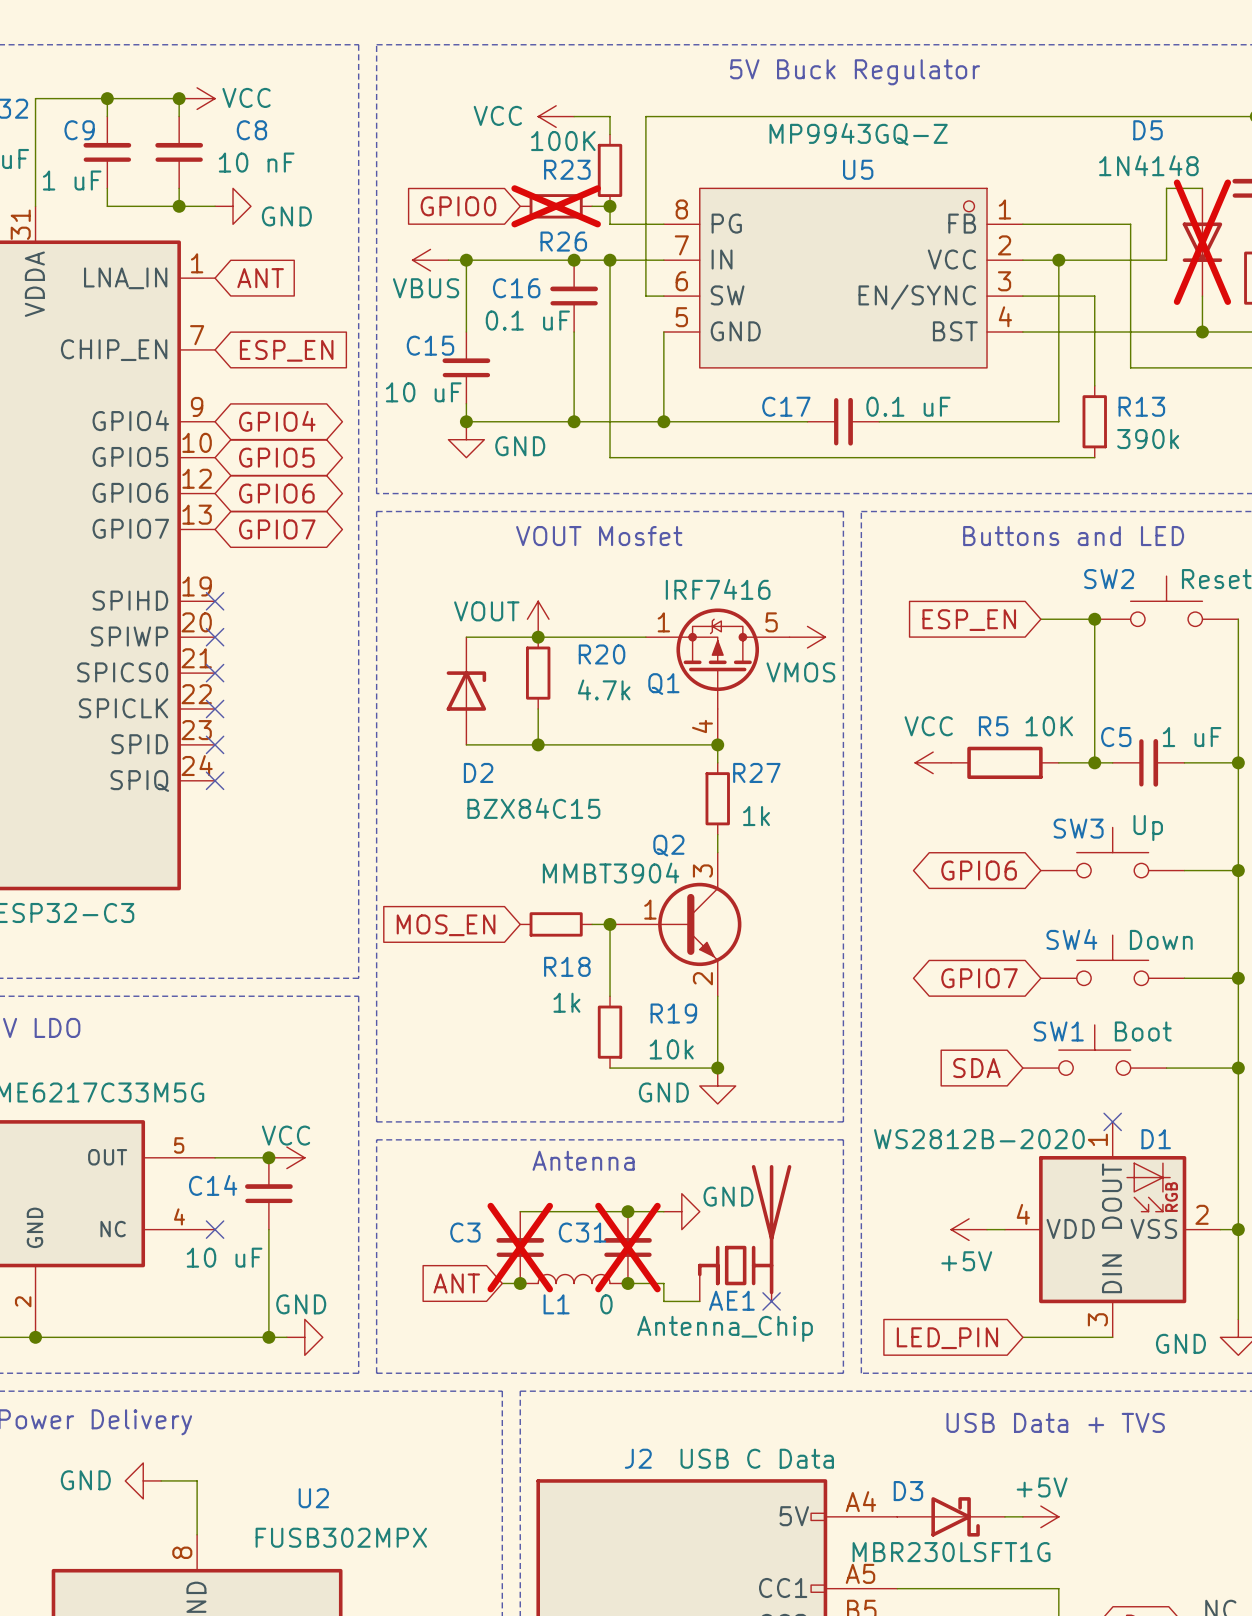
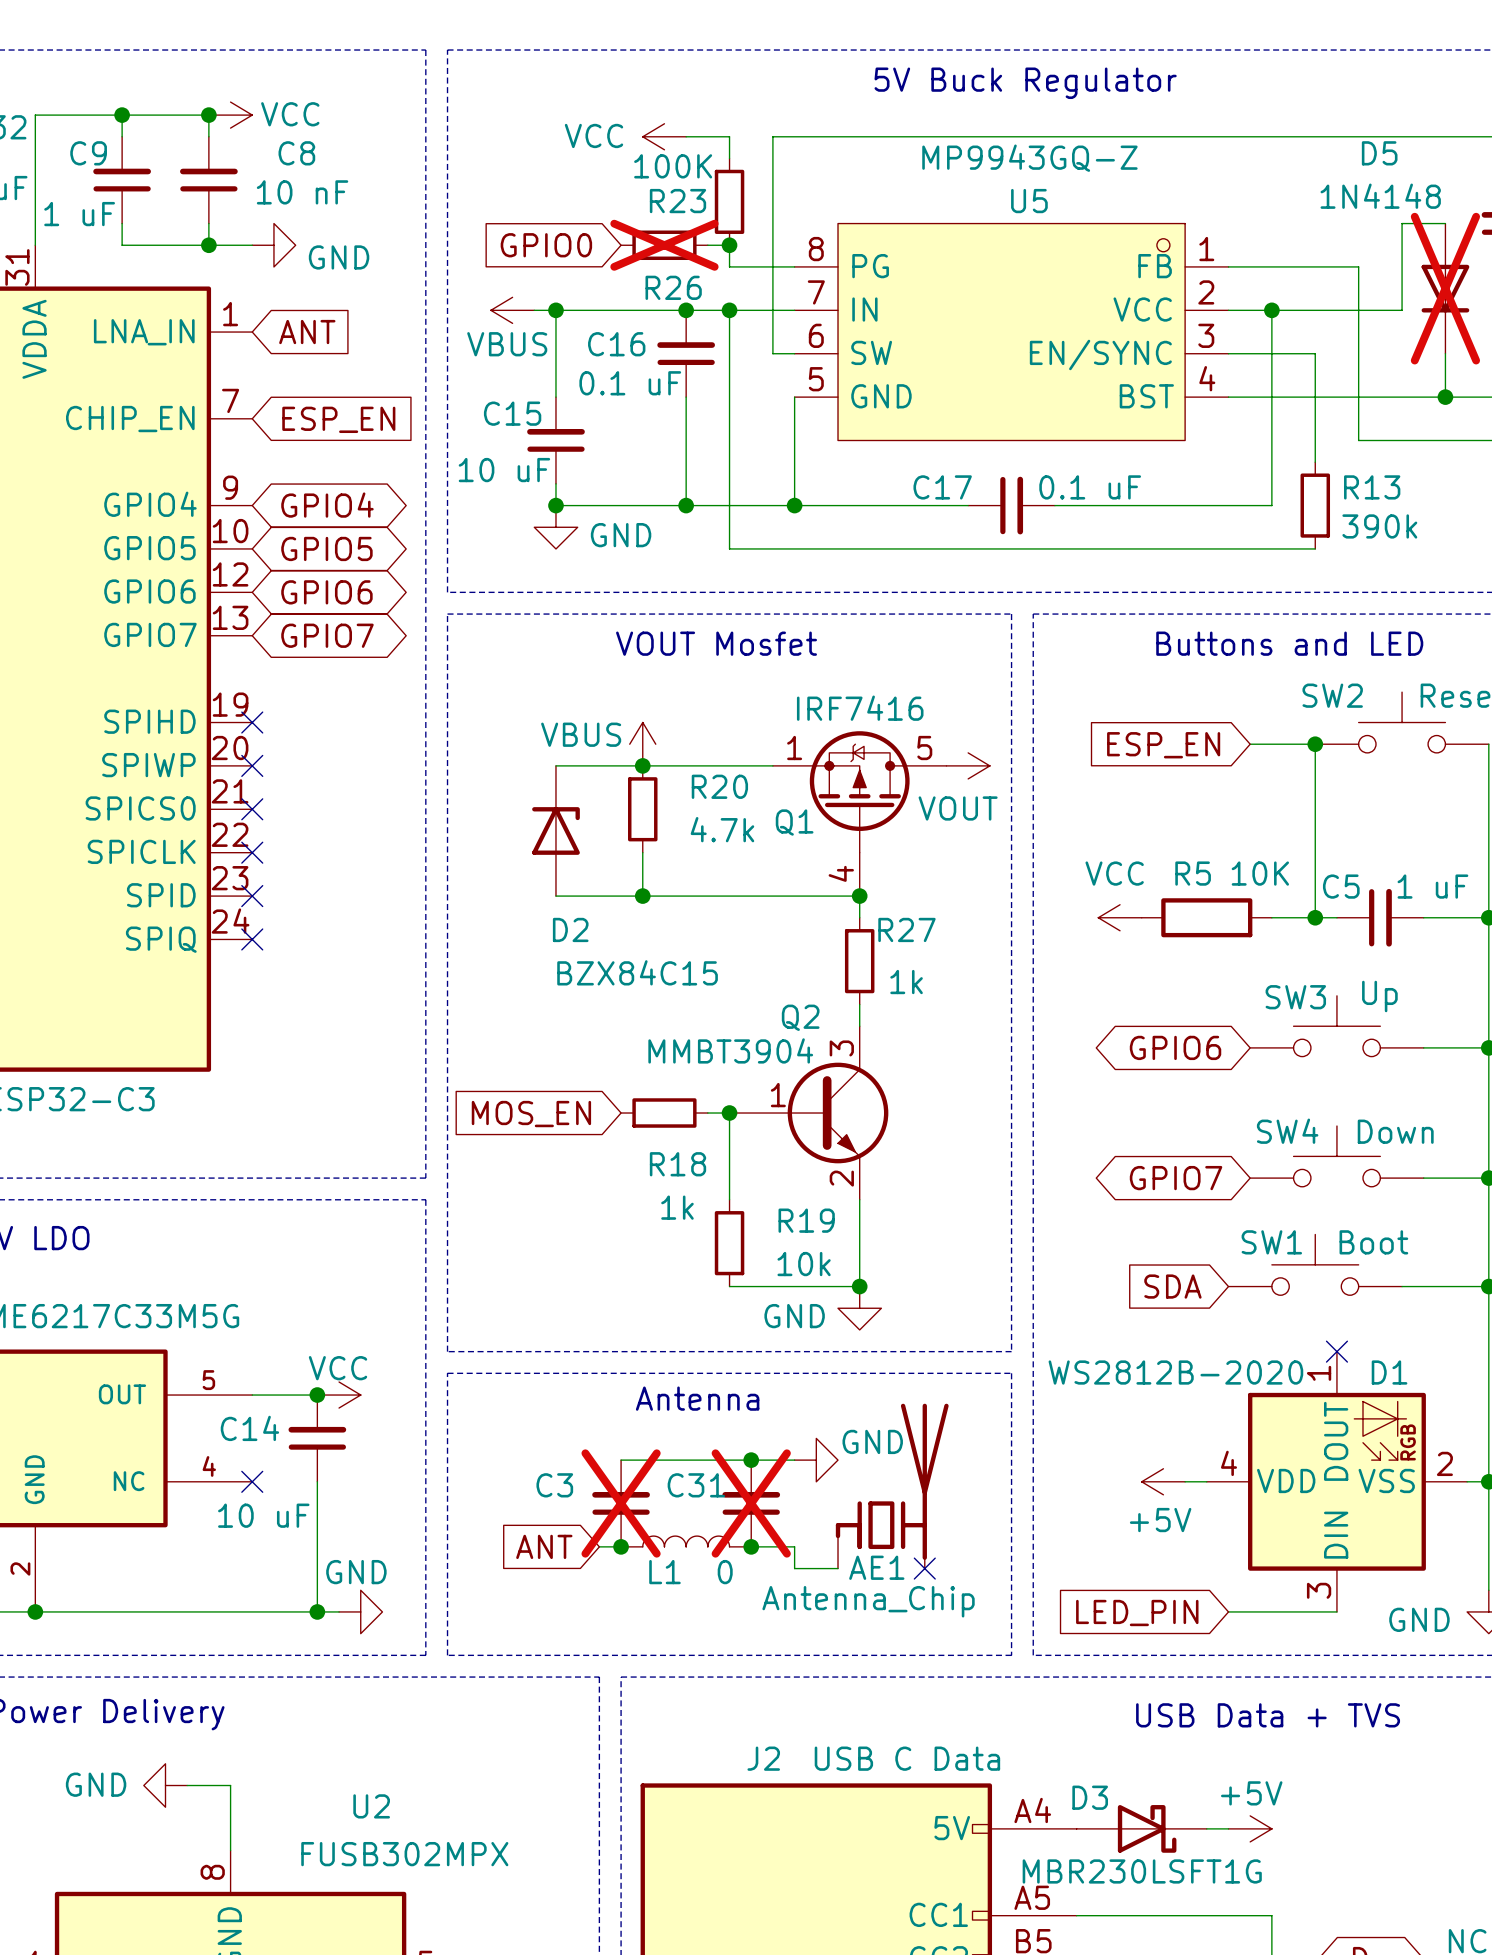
power symbol: VOUT (538, 619) -> VBUS (642, 744)
power symbol: VMOS (807, 637) -> VOUT (968, 765)

